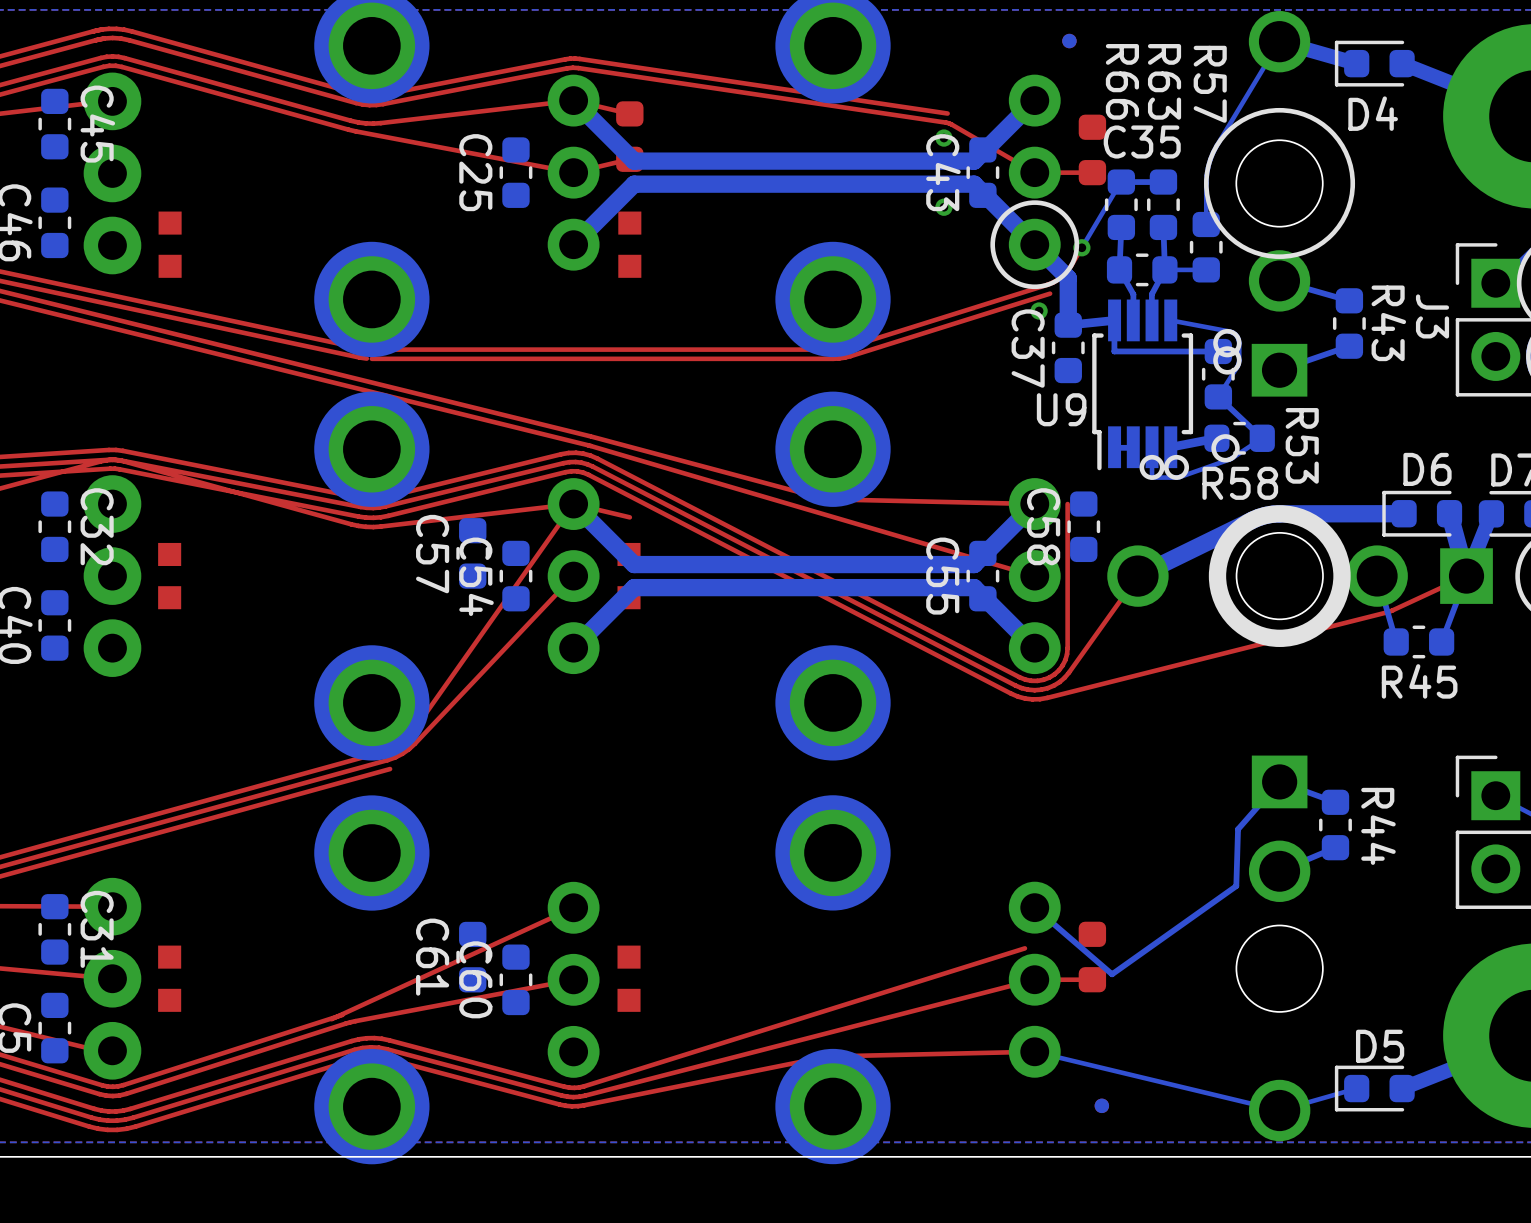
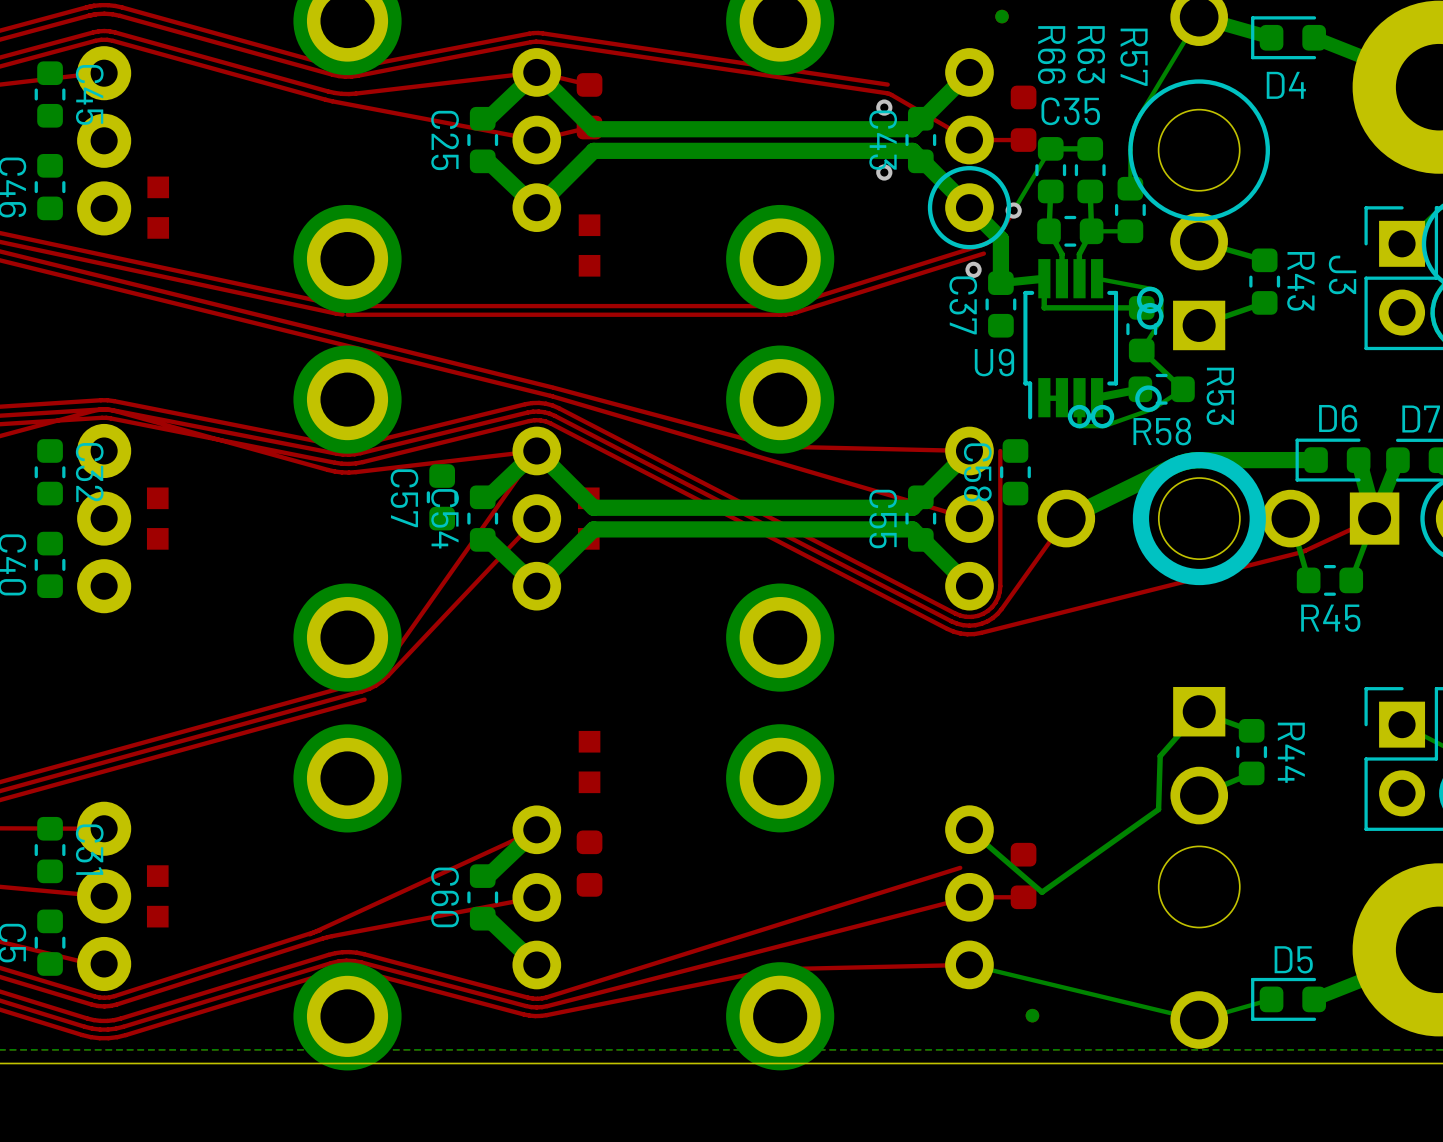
bottom track: none -> (536, 72) (488, 118)
bottom track: none -> (488, 161) (536, 207)
part position: (629, 244) -> (589, 245)
top track: (573, 504) (629, 517) -> none
bottom track: none -> (536, 450) (488, 497)
bottom track: none -> (488, 539) (536, 586)
bottom track: none -> (536, 829) (488, 876)
C61 side: bottom (472, 957) -> top (589, 863)
part position: (629, 978) -> (589, 762)
bottom track: none -> (488, 918) (536, 965)

